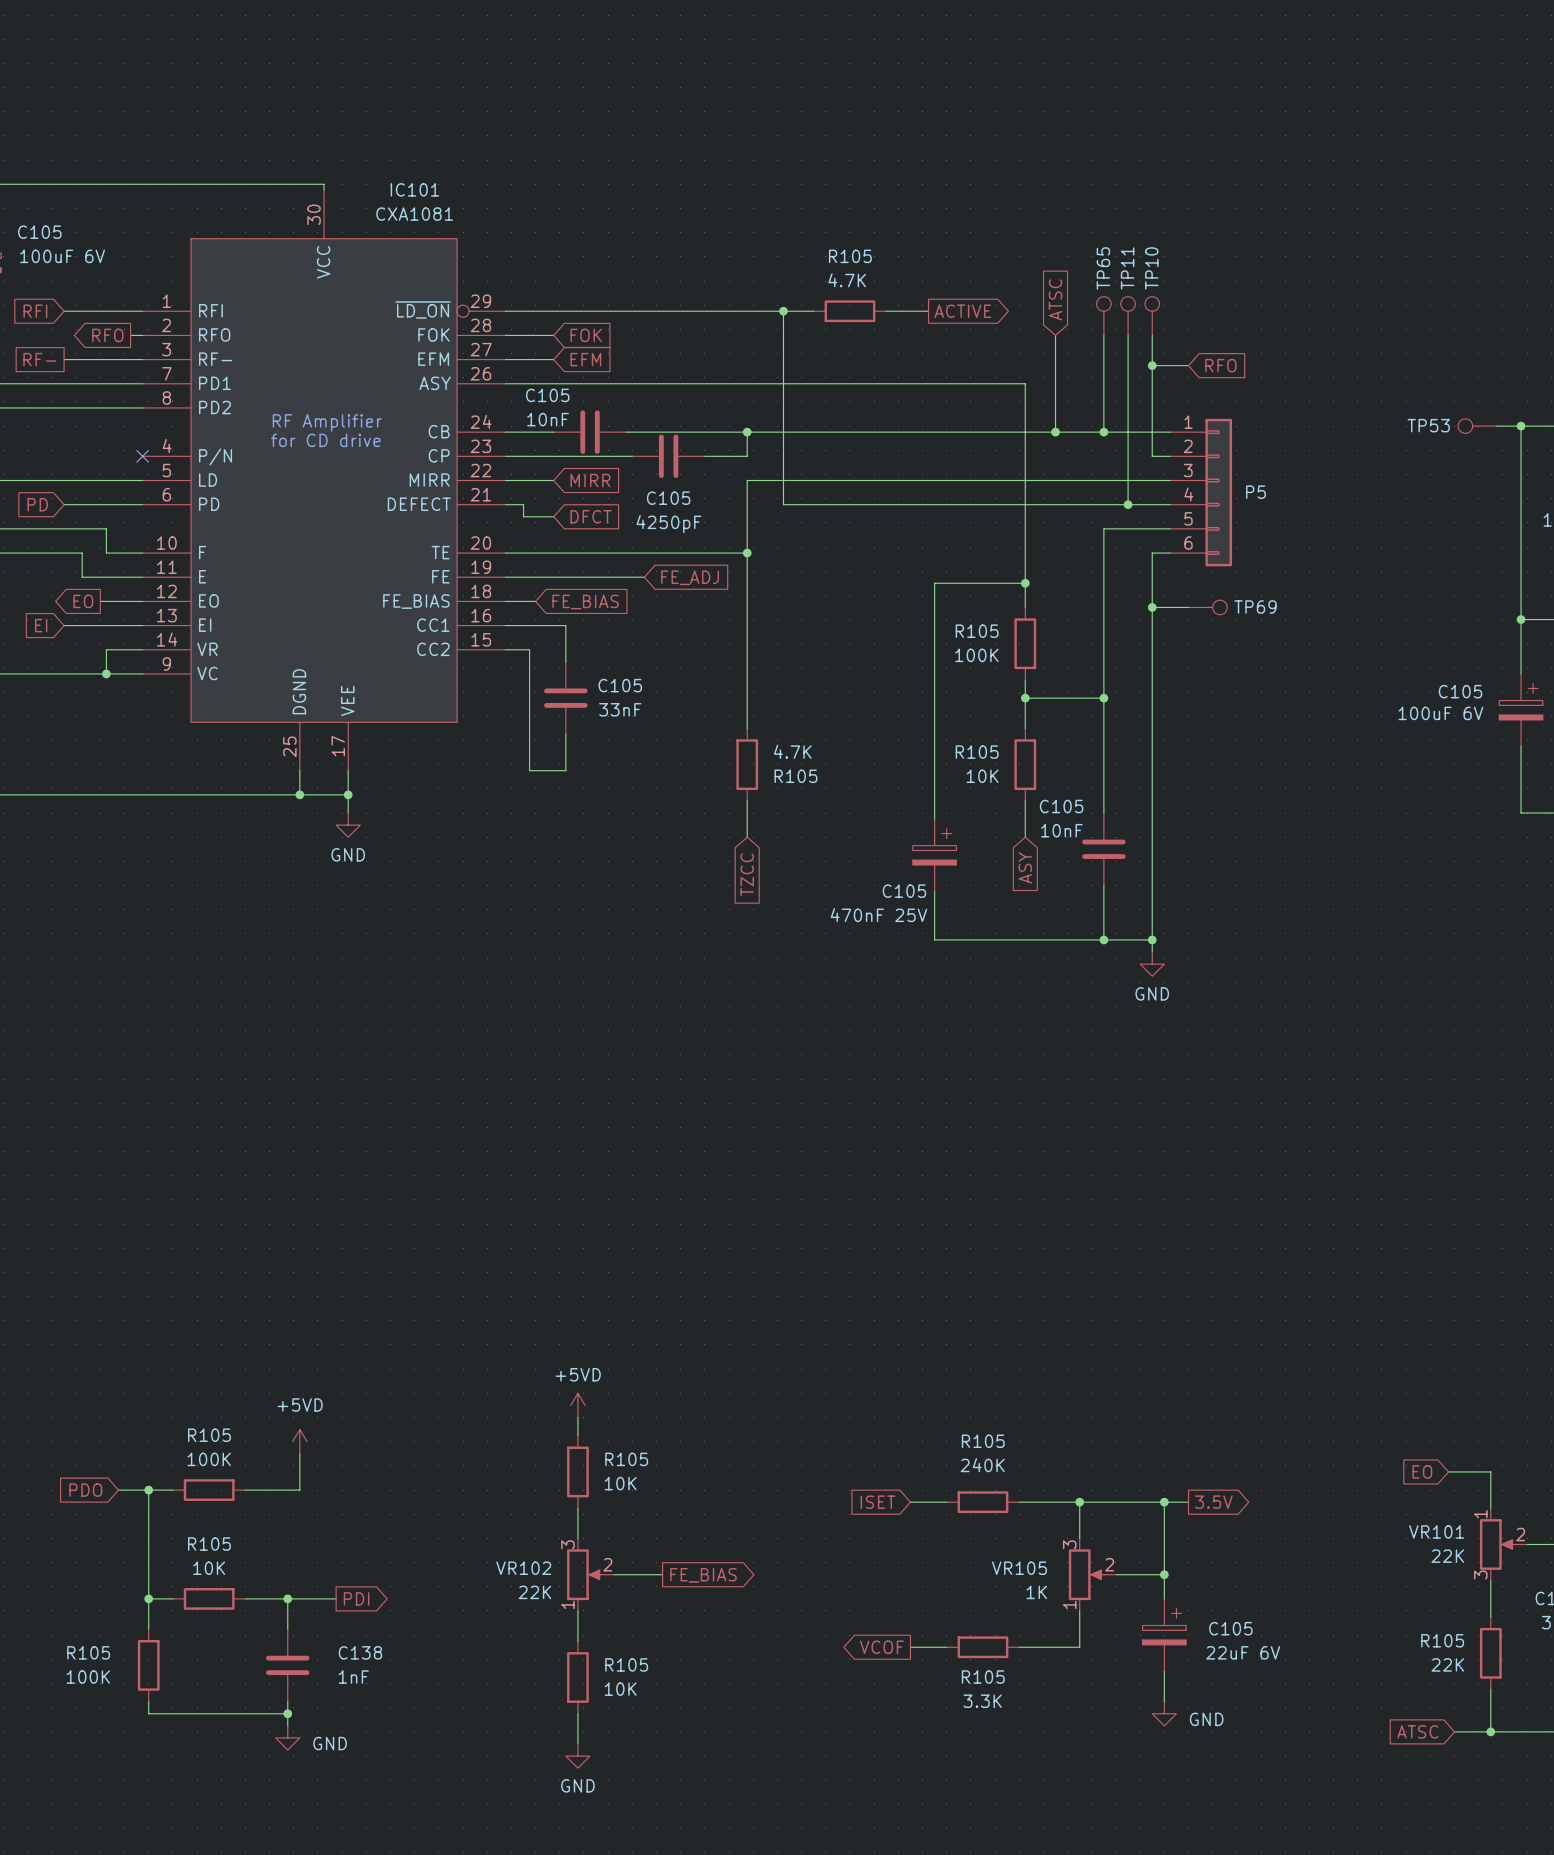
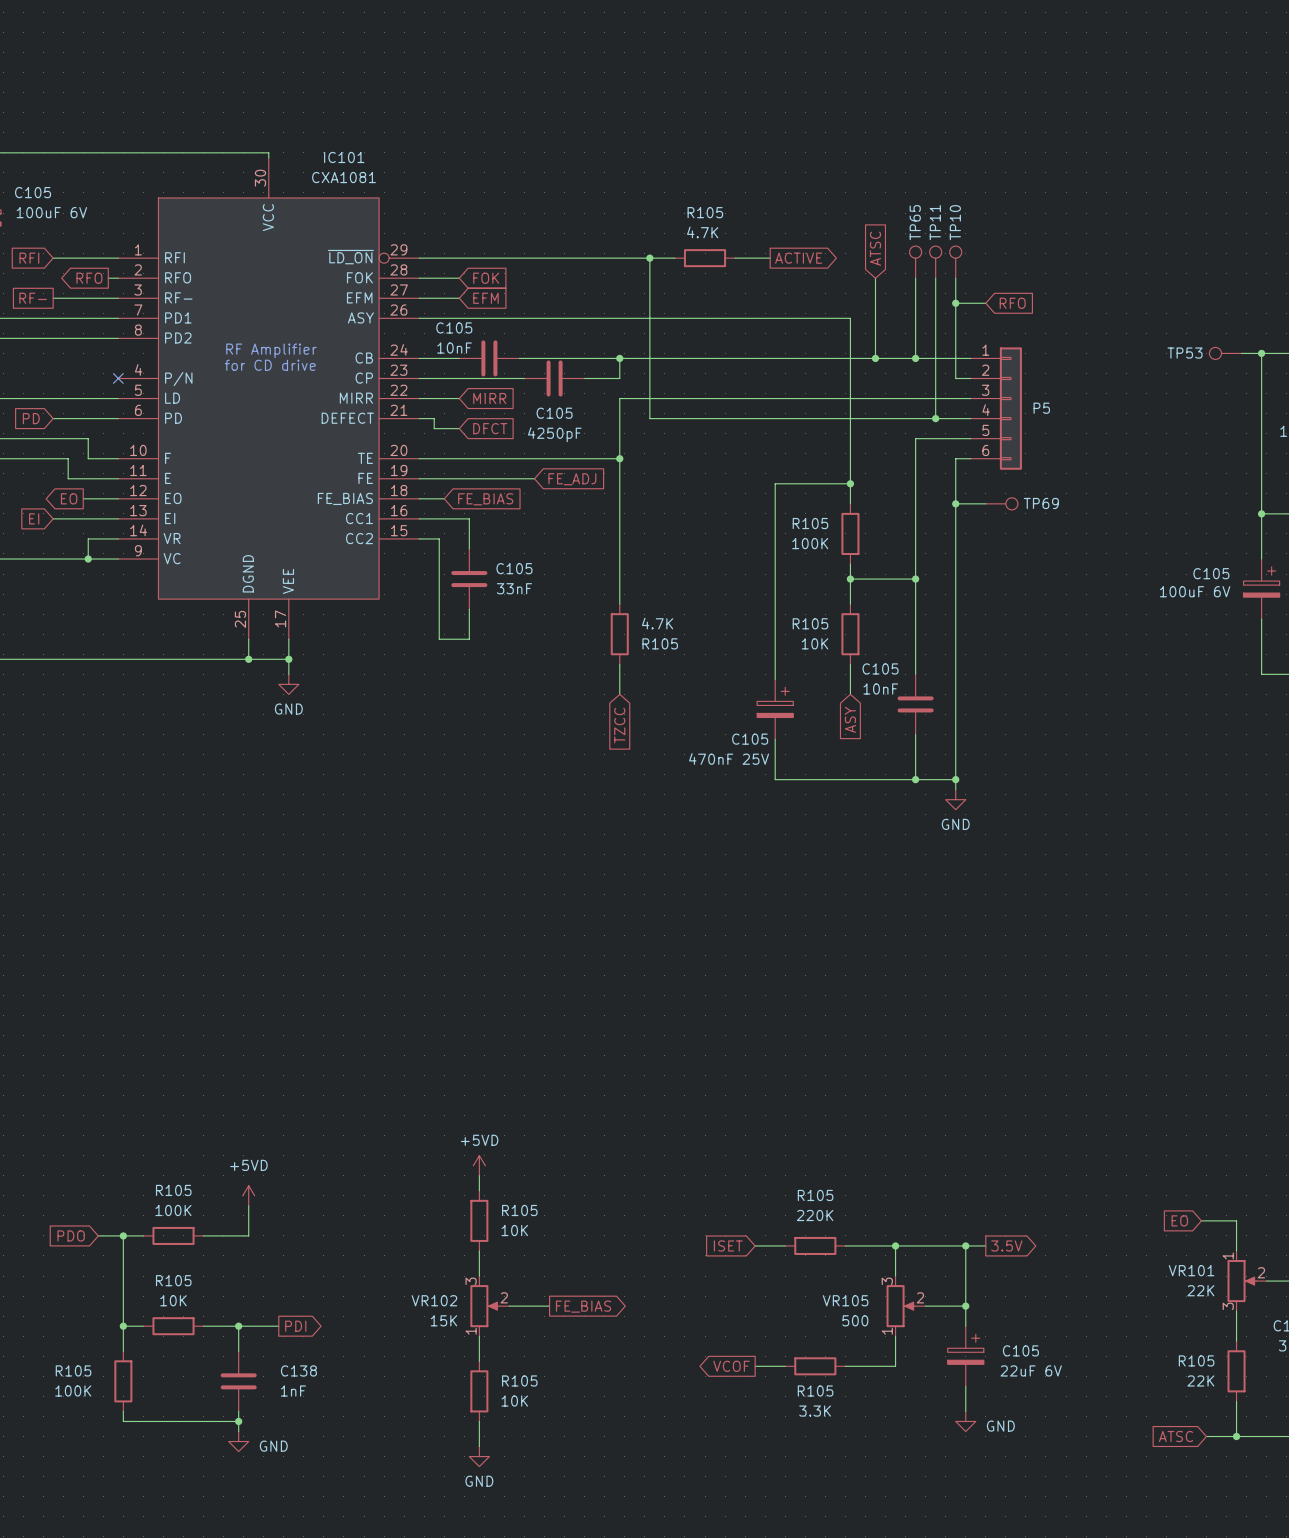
R105 value: 240K (982, 1465) -> 220K (815, 1215)
VR102 value: 22K (534, 1592) -> 15K (443, 1320)
VR105 value: 1K (1036, 1592) -> 500 (855, 1320)

